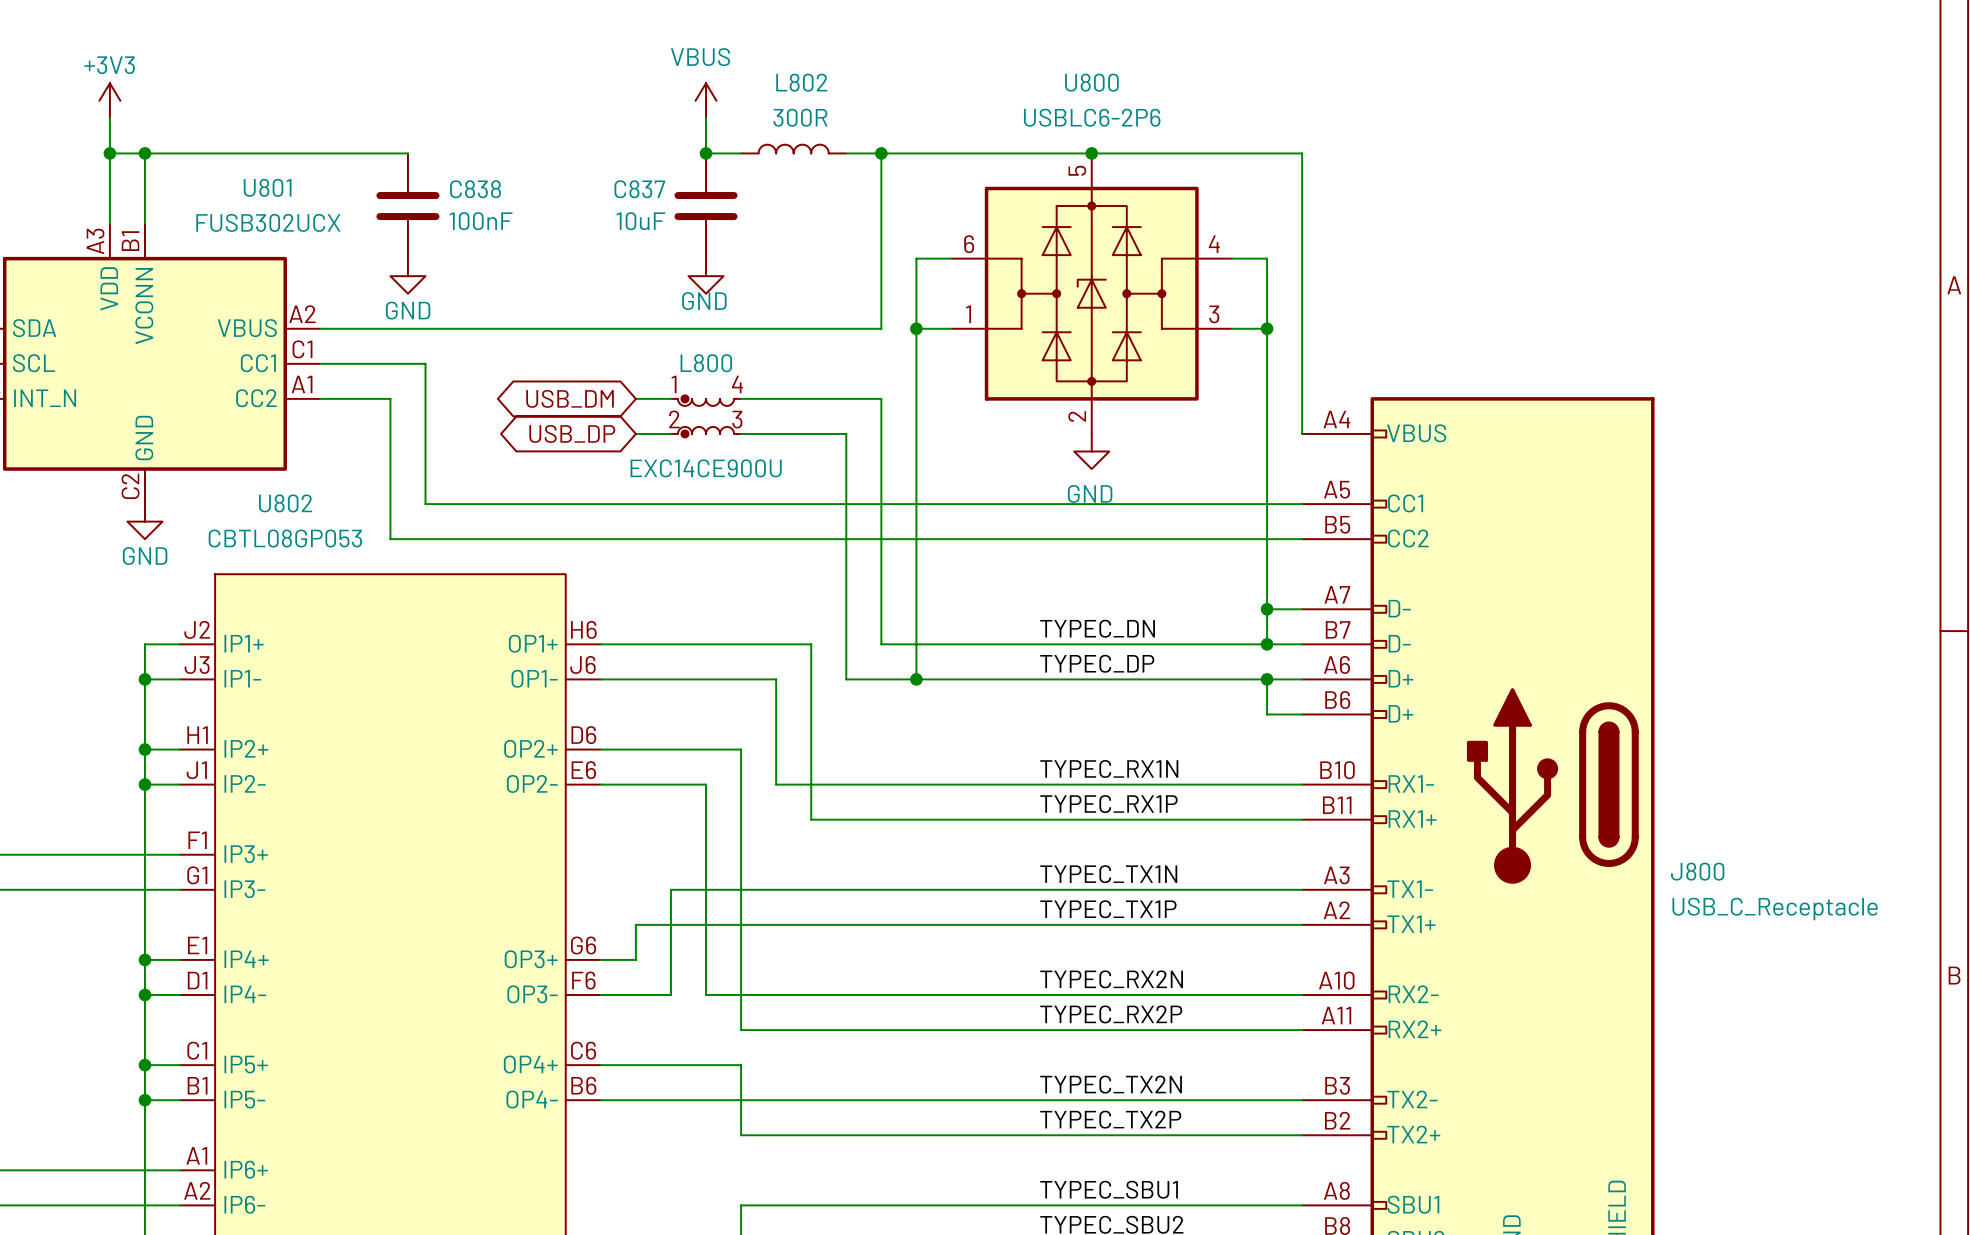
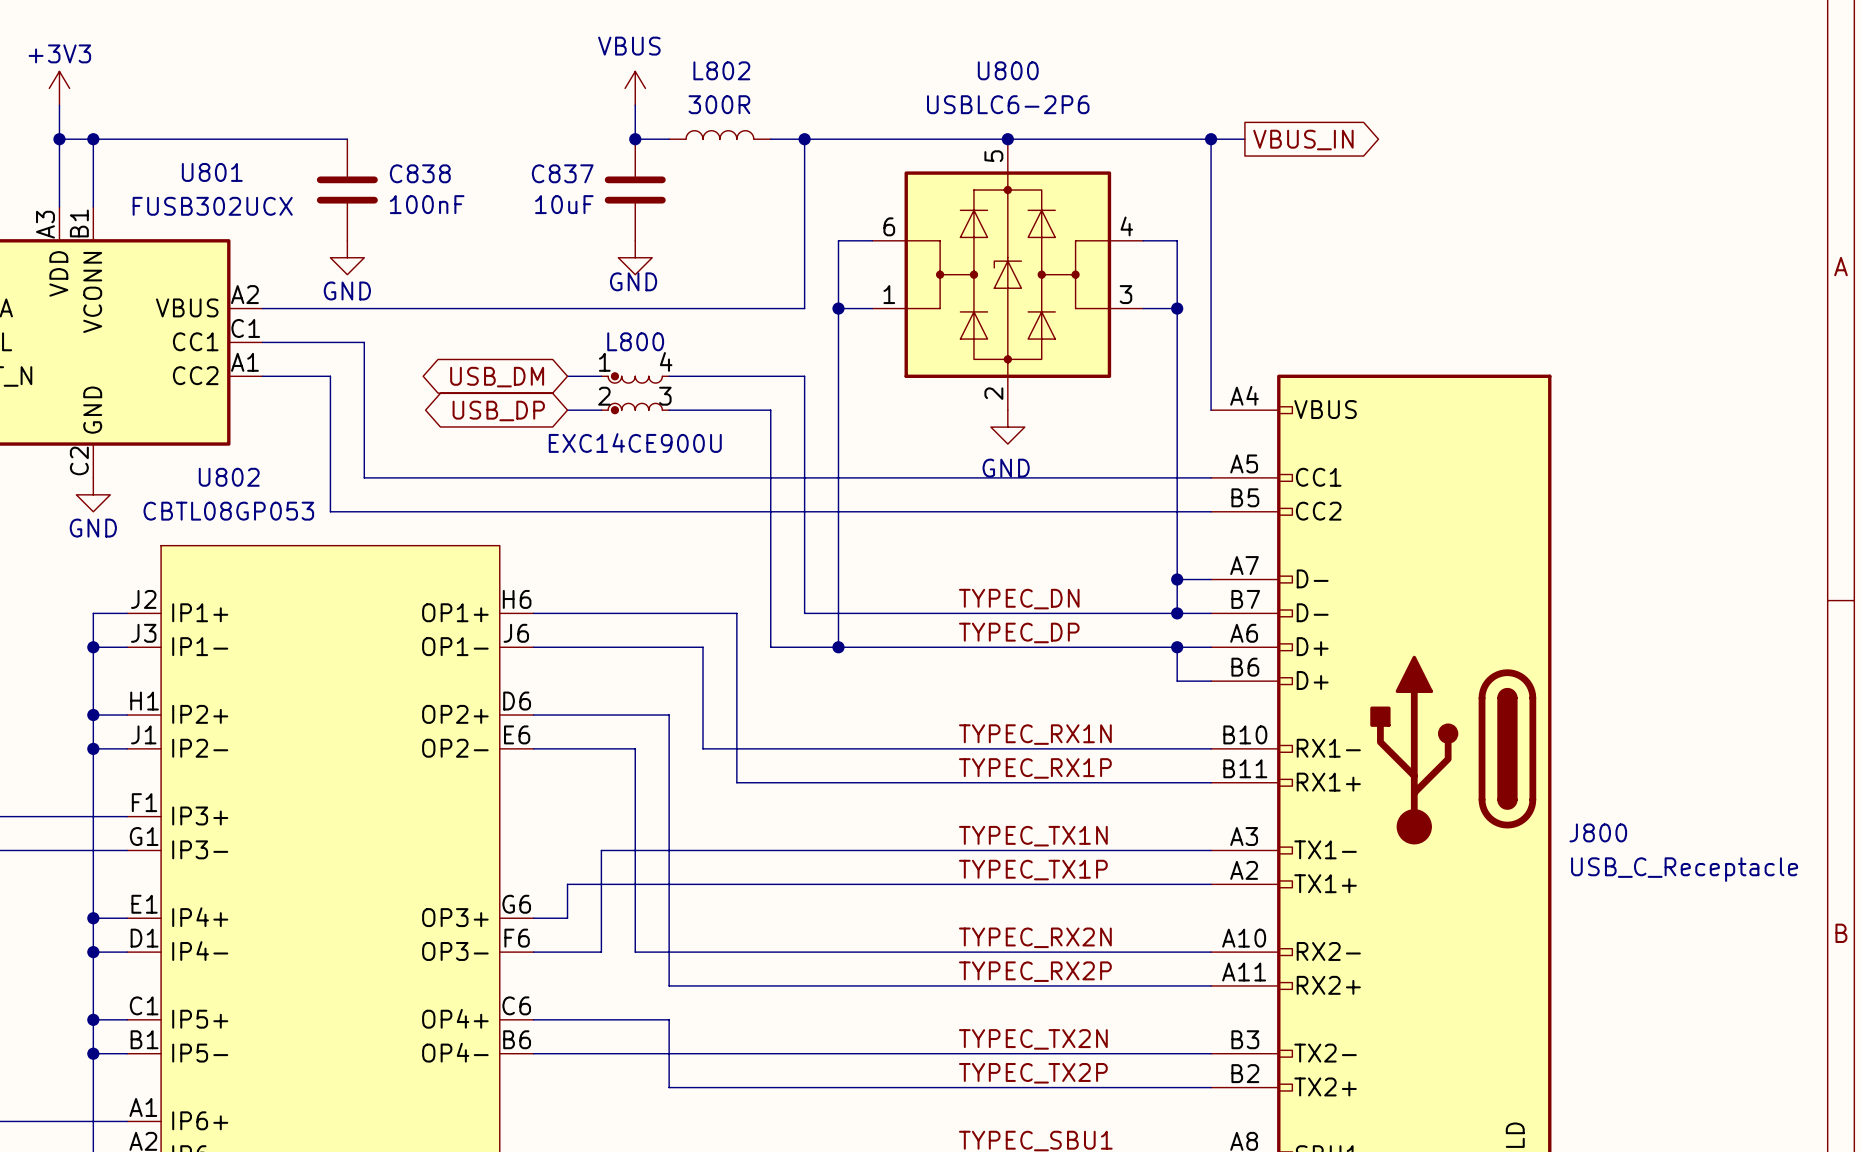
wire: none -> (1211, 139) (1244, 139)
junction: none -> (1211, 139)
global label: none -> VBUS_IN (1303, 140)

